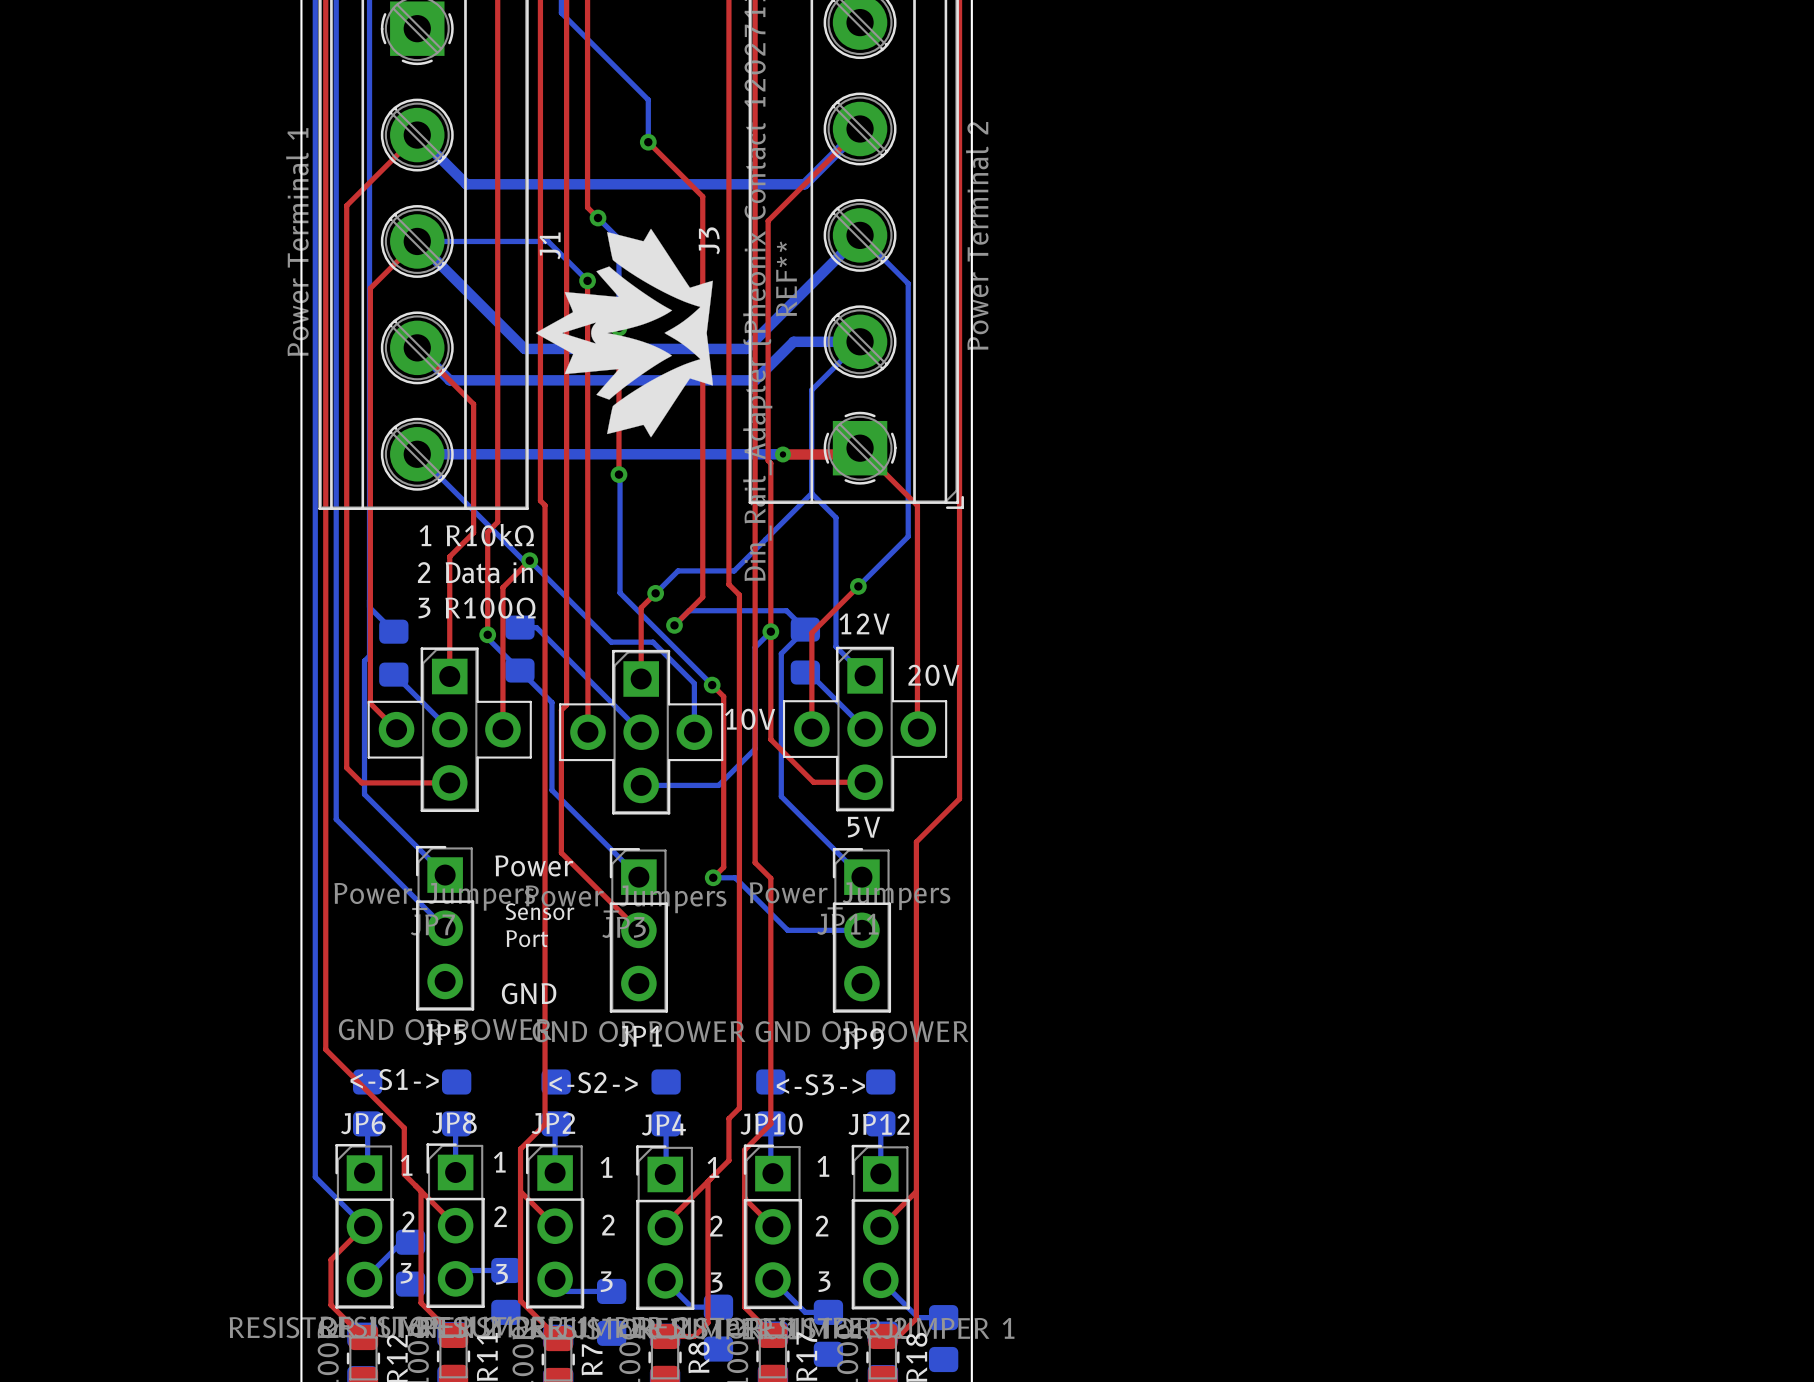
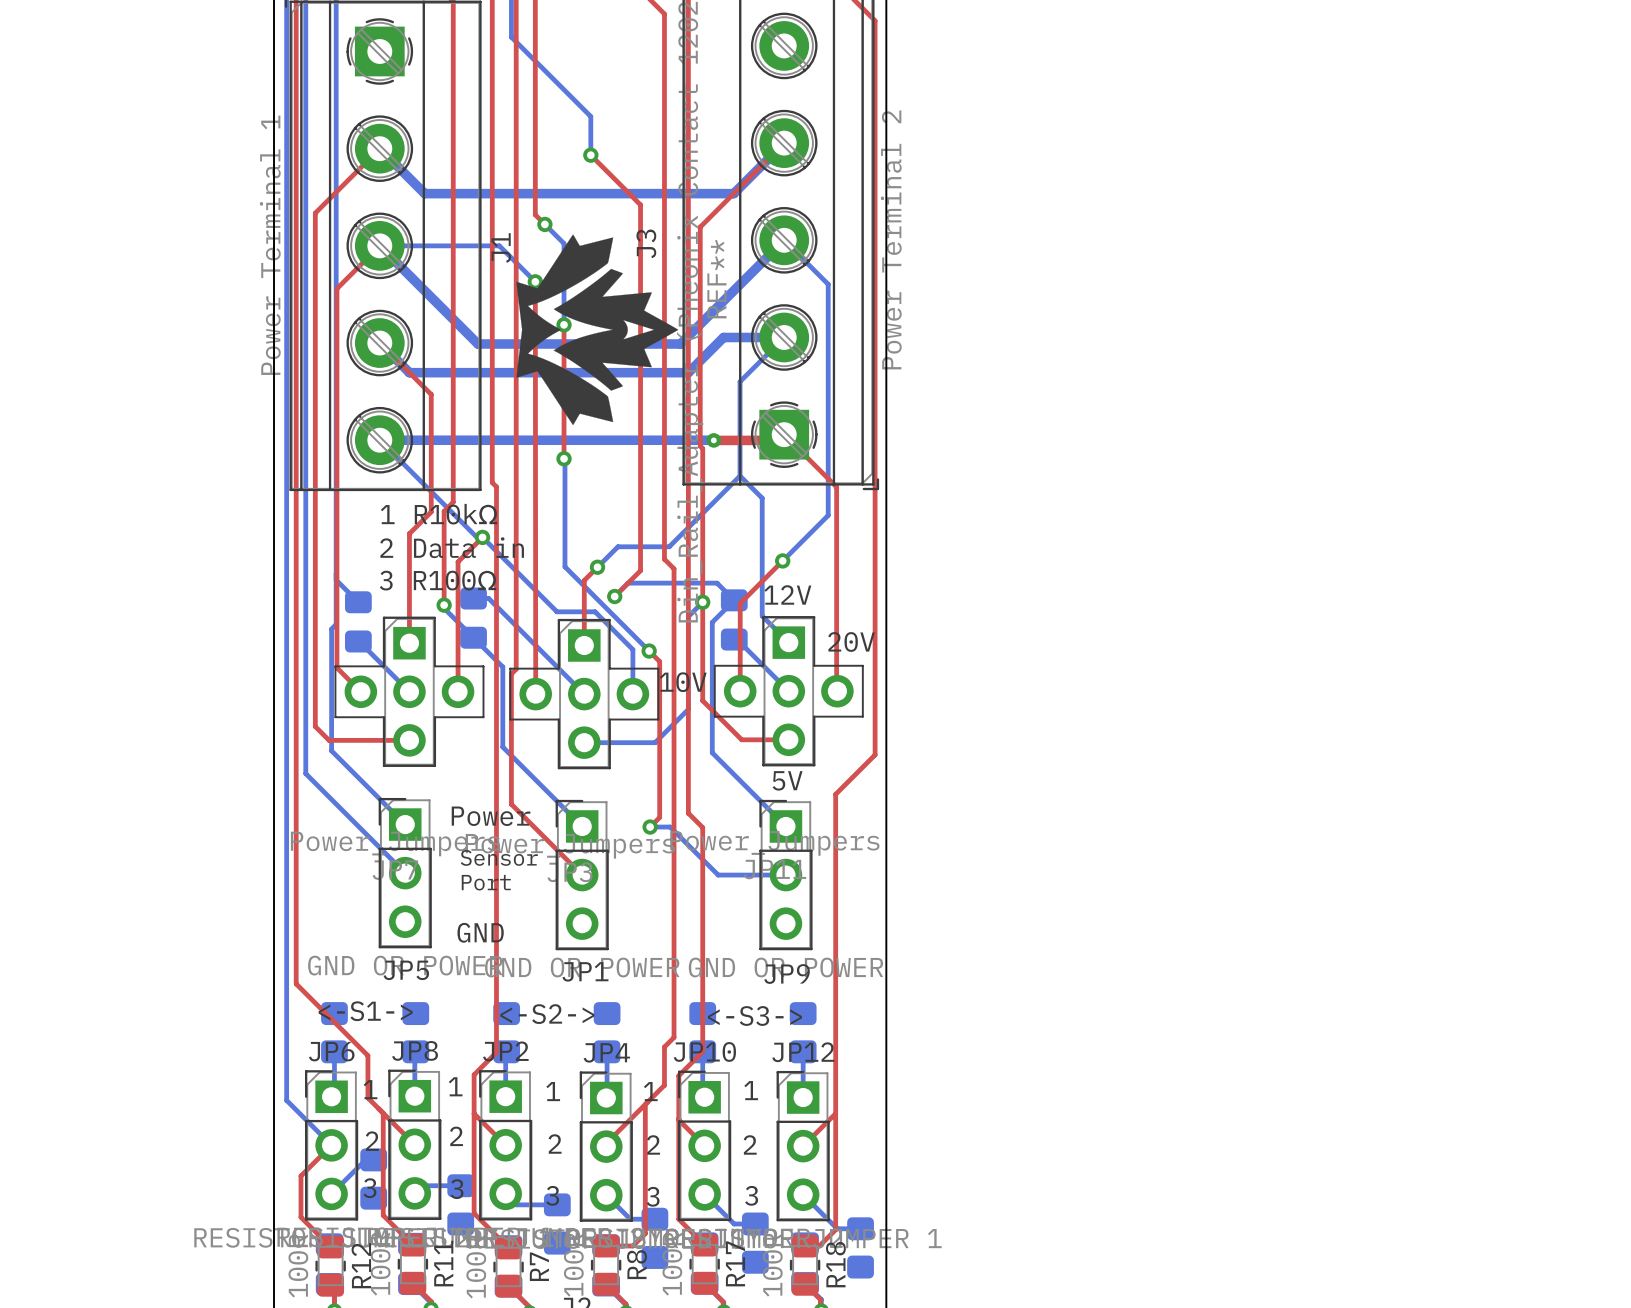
drawing: [535, 228, 713, 438] -> none
drawing: none -> [516, 234, 679, 426]

